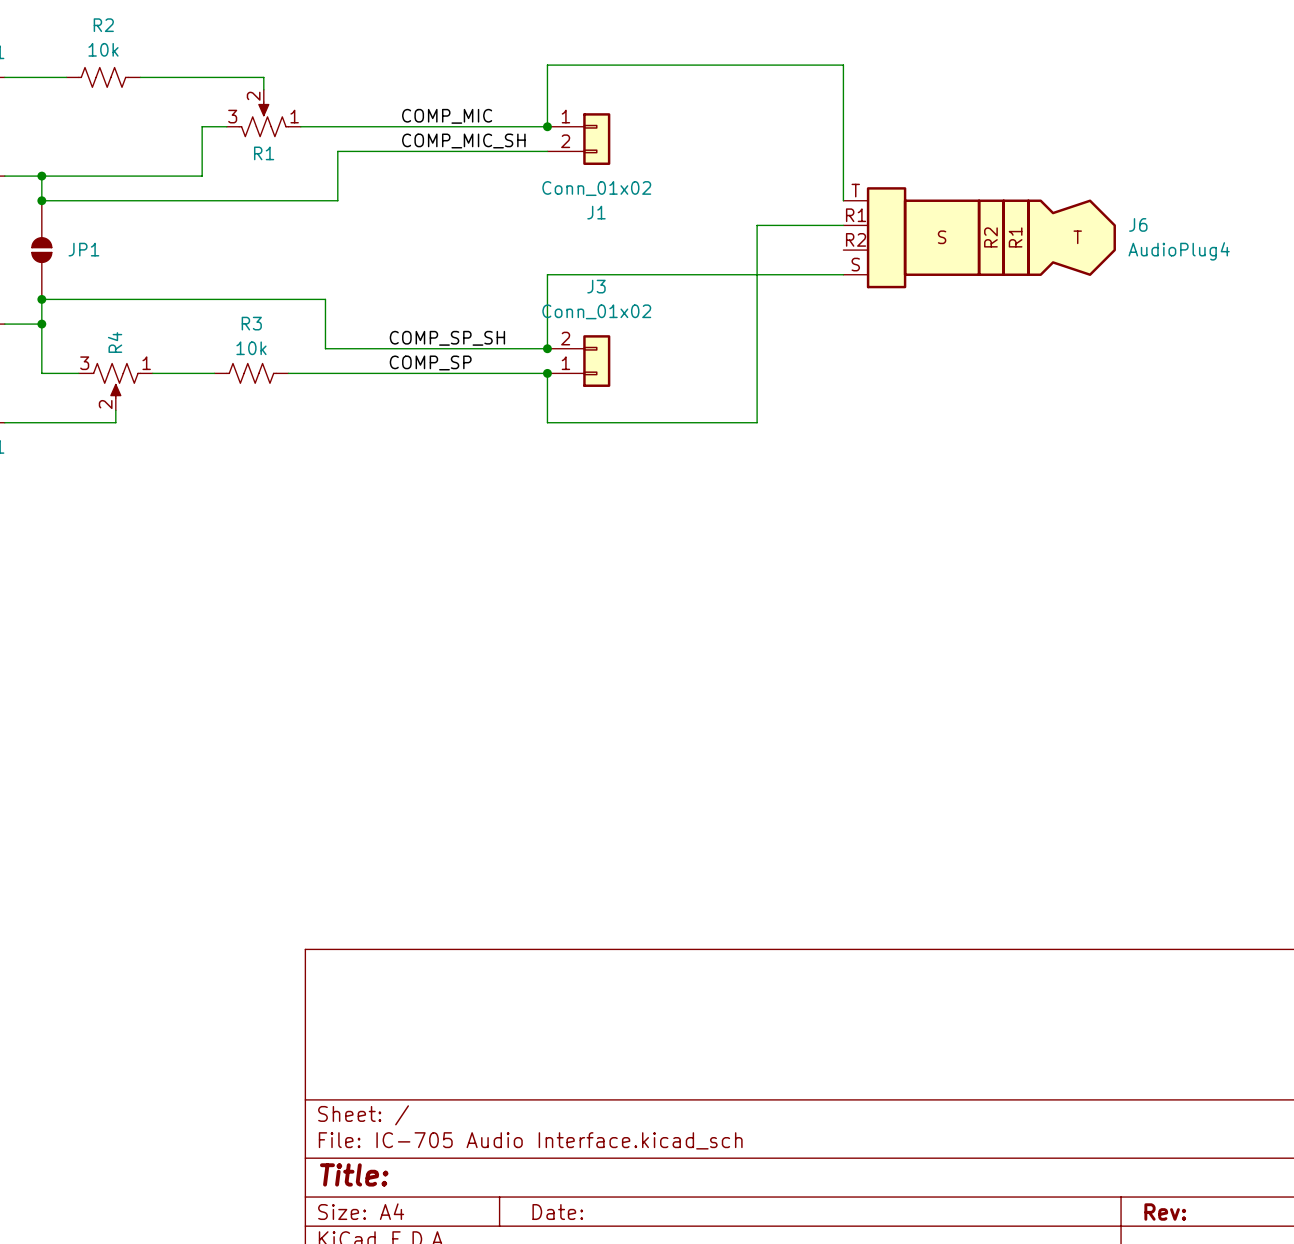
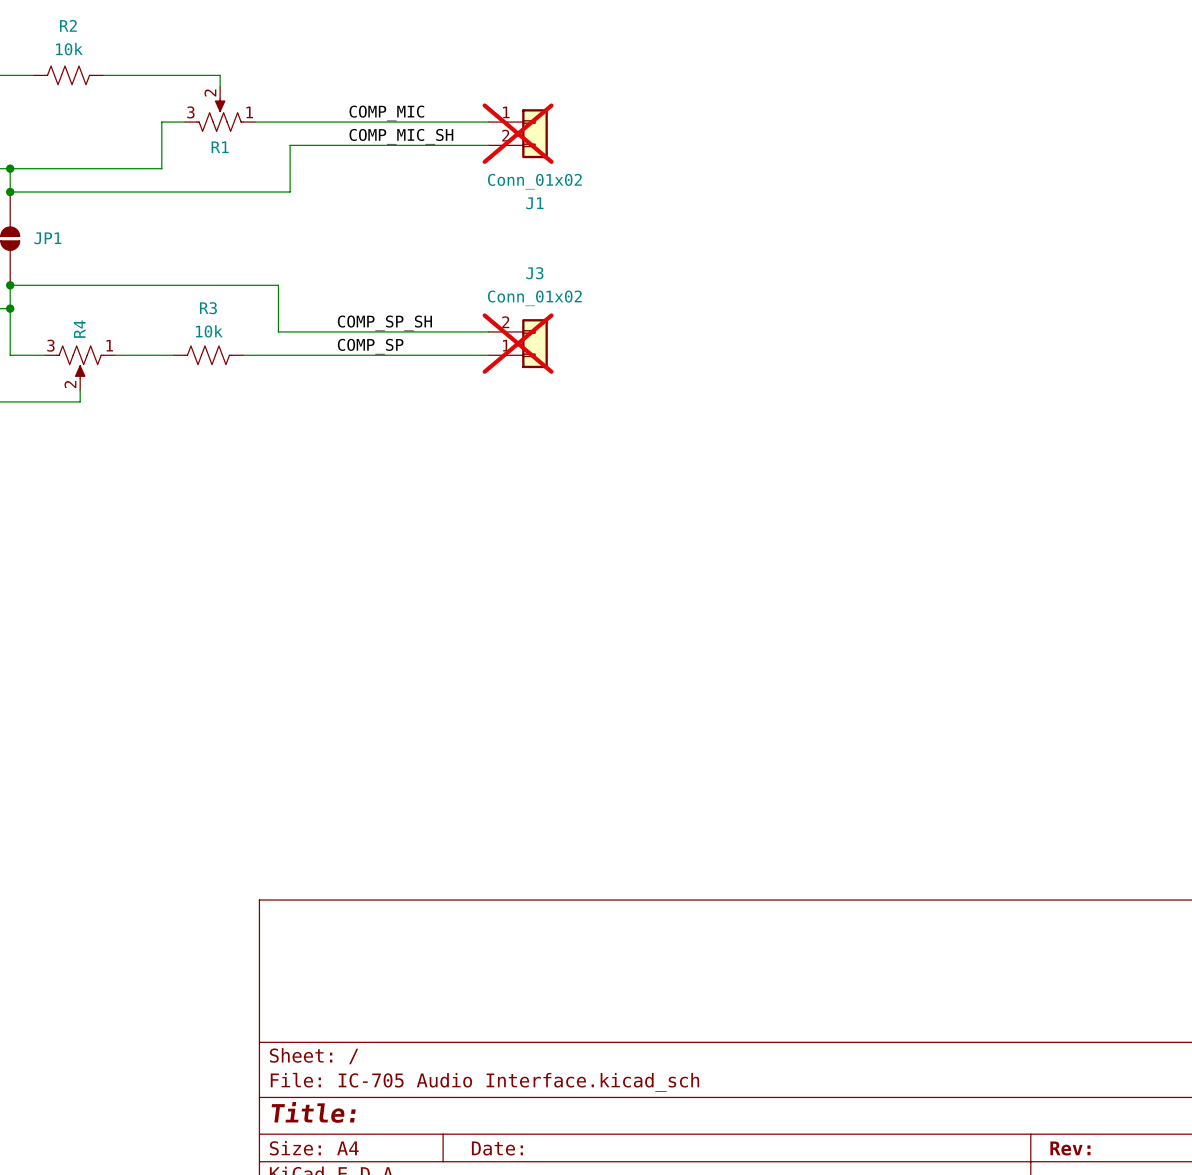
wire: (547, 126) (547, 65) (843, 65) (843, 200) -> none
junction: (547, 126) -> none
J1 do-not-place cross: none -> (518, 133)
wire: (843, 225) (757, 225) (757, 422) (547, 422) (547, 373) -> none
J6: AudioPlug4 (979, 237) -> none
wire: (843, 274) (547, 274) (547, 348) -> none
junction: (547, 348) -> none
J3 do-not-place cross: none -> (518, 343)
junction: (547, 373) -> none

